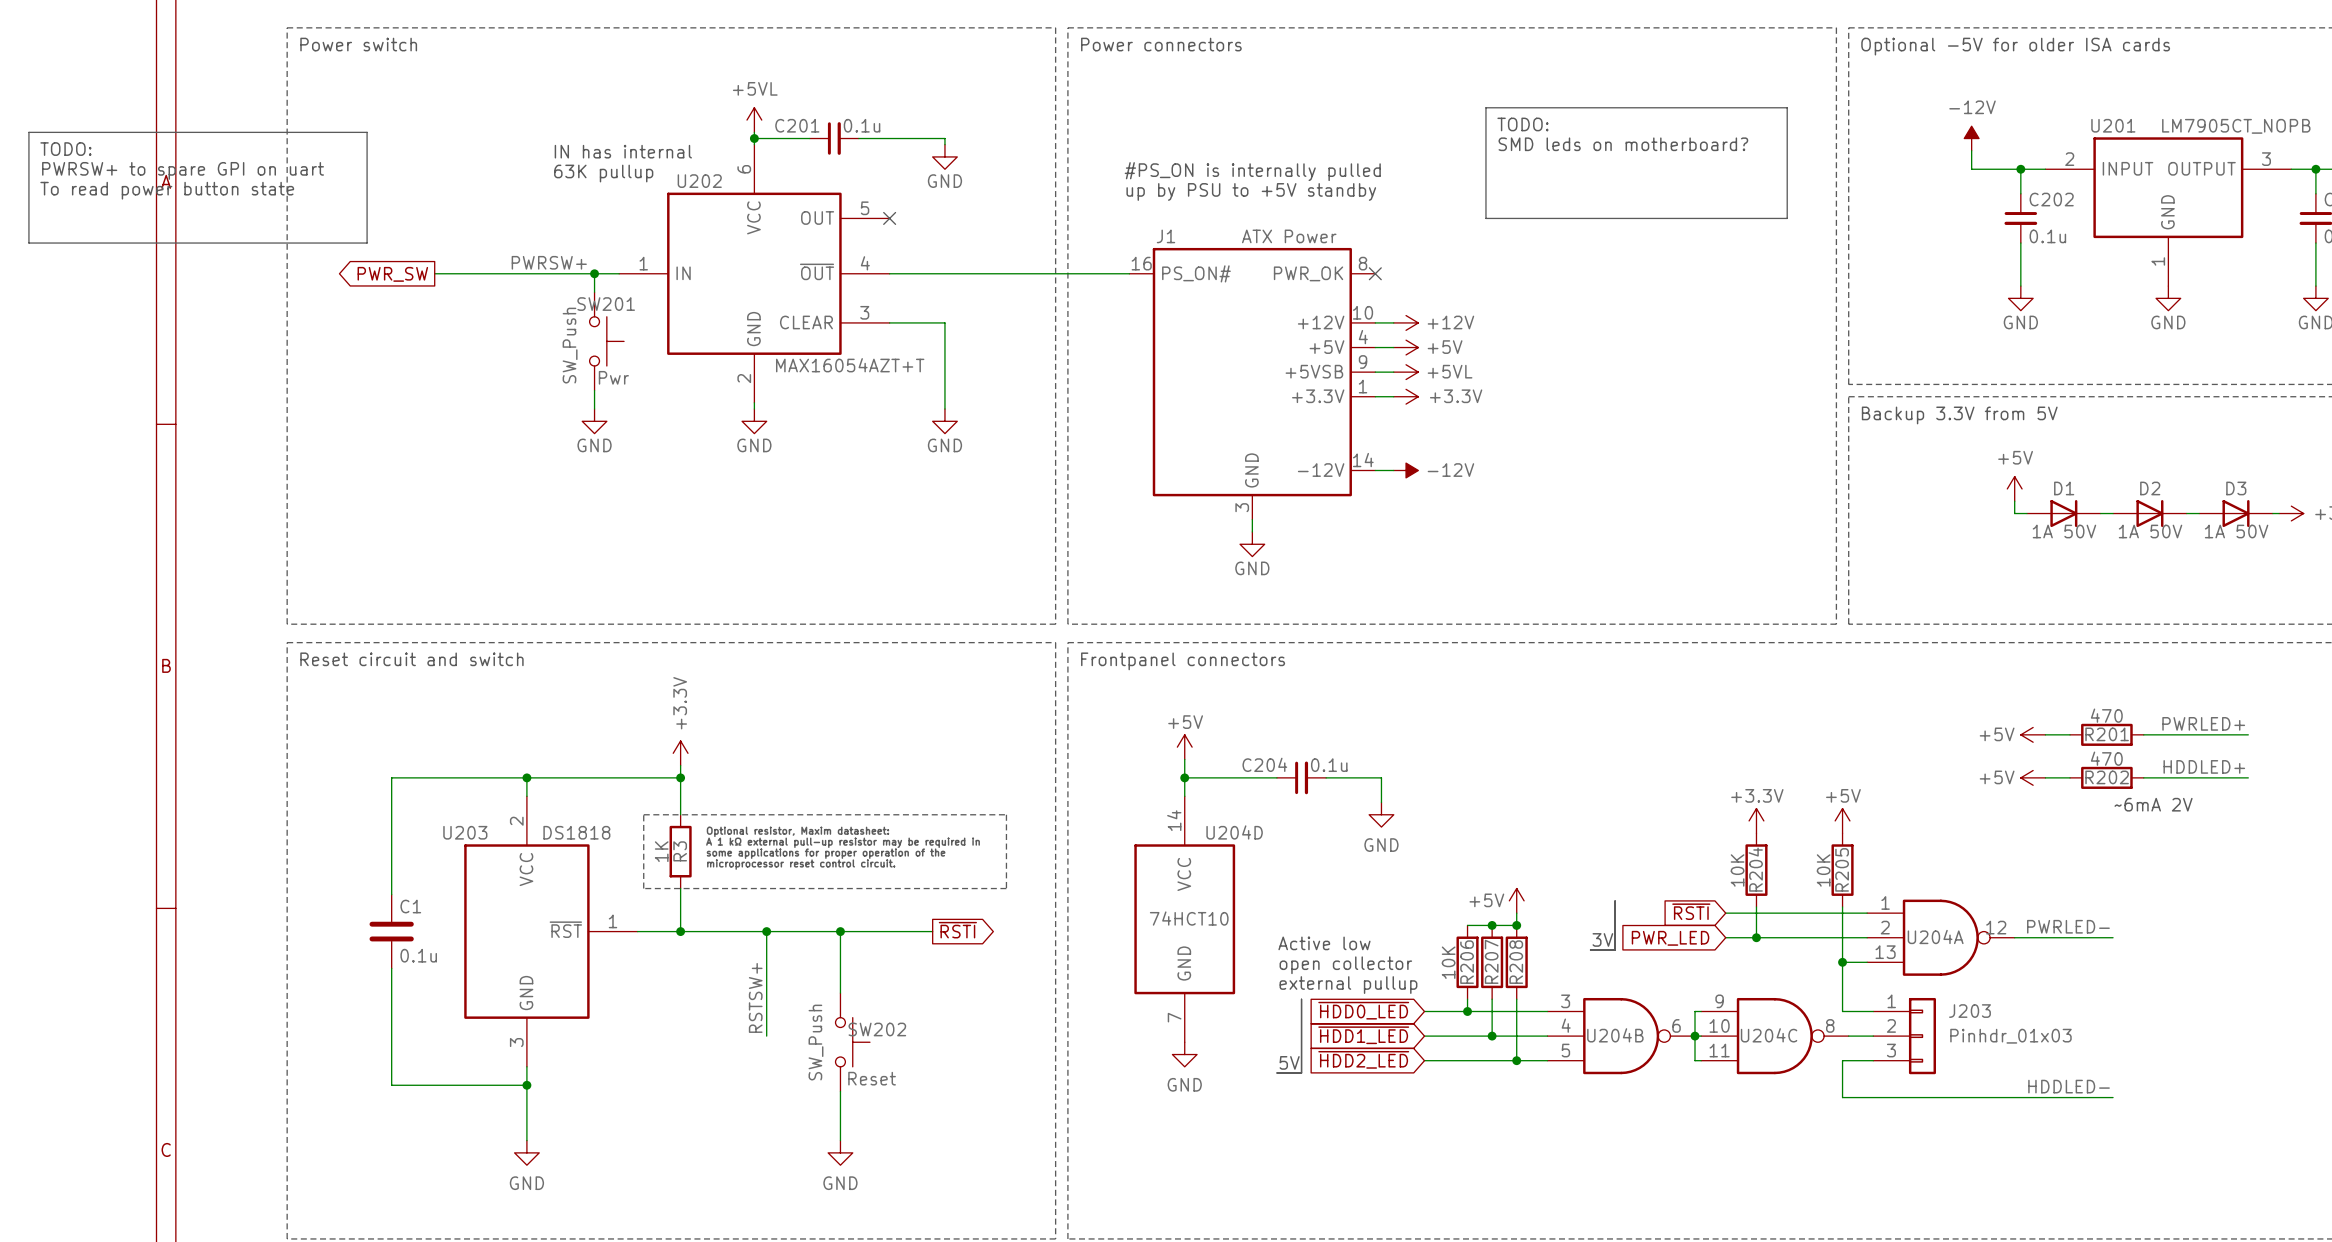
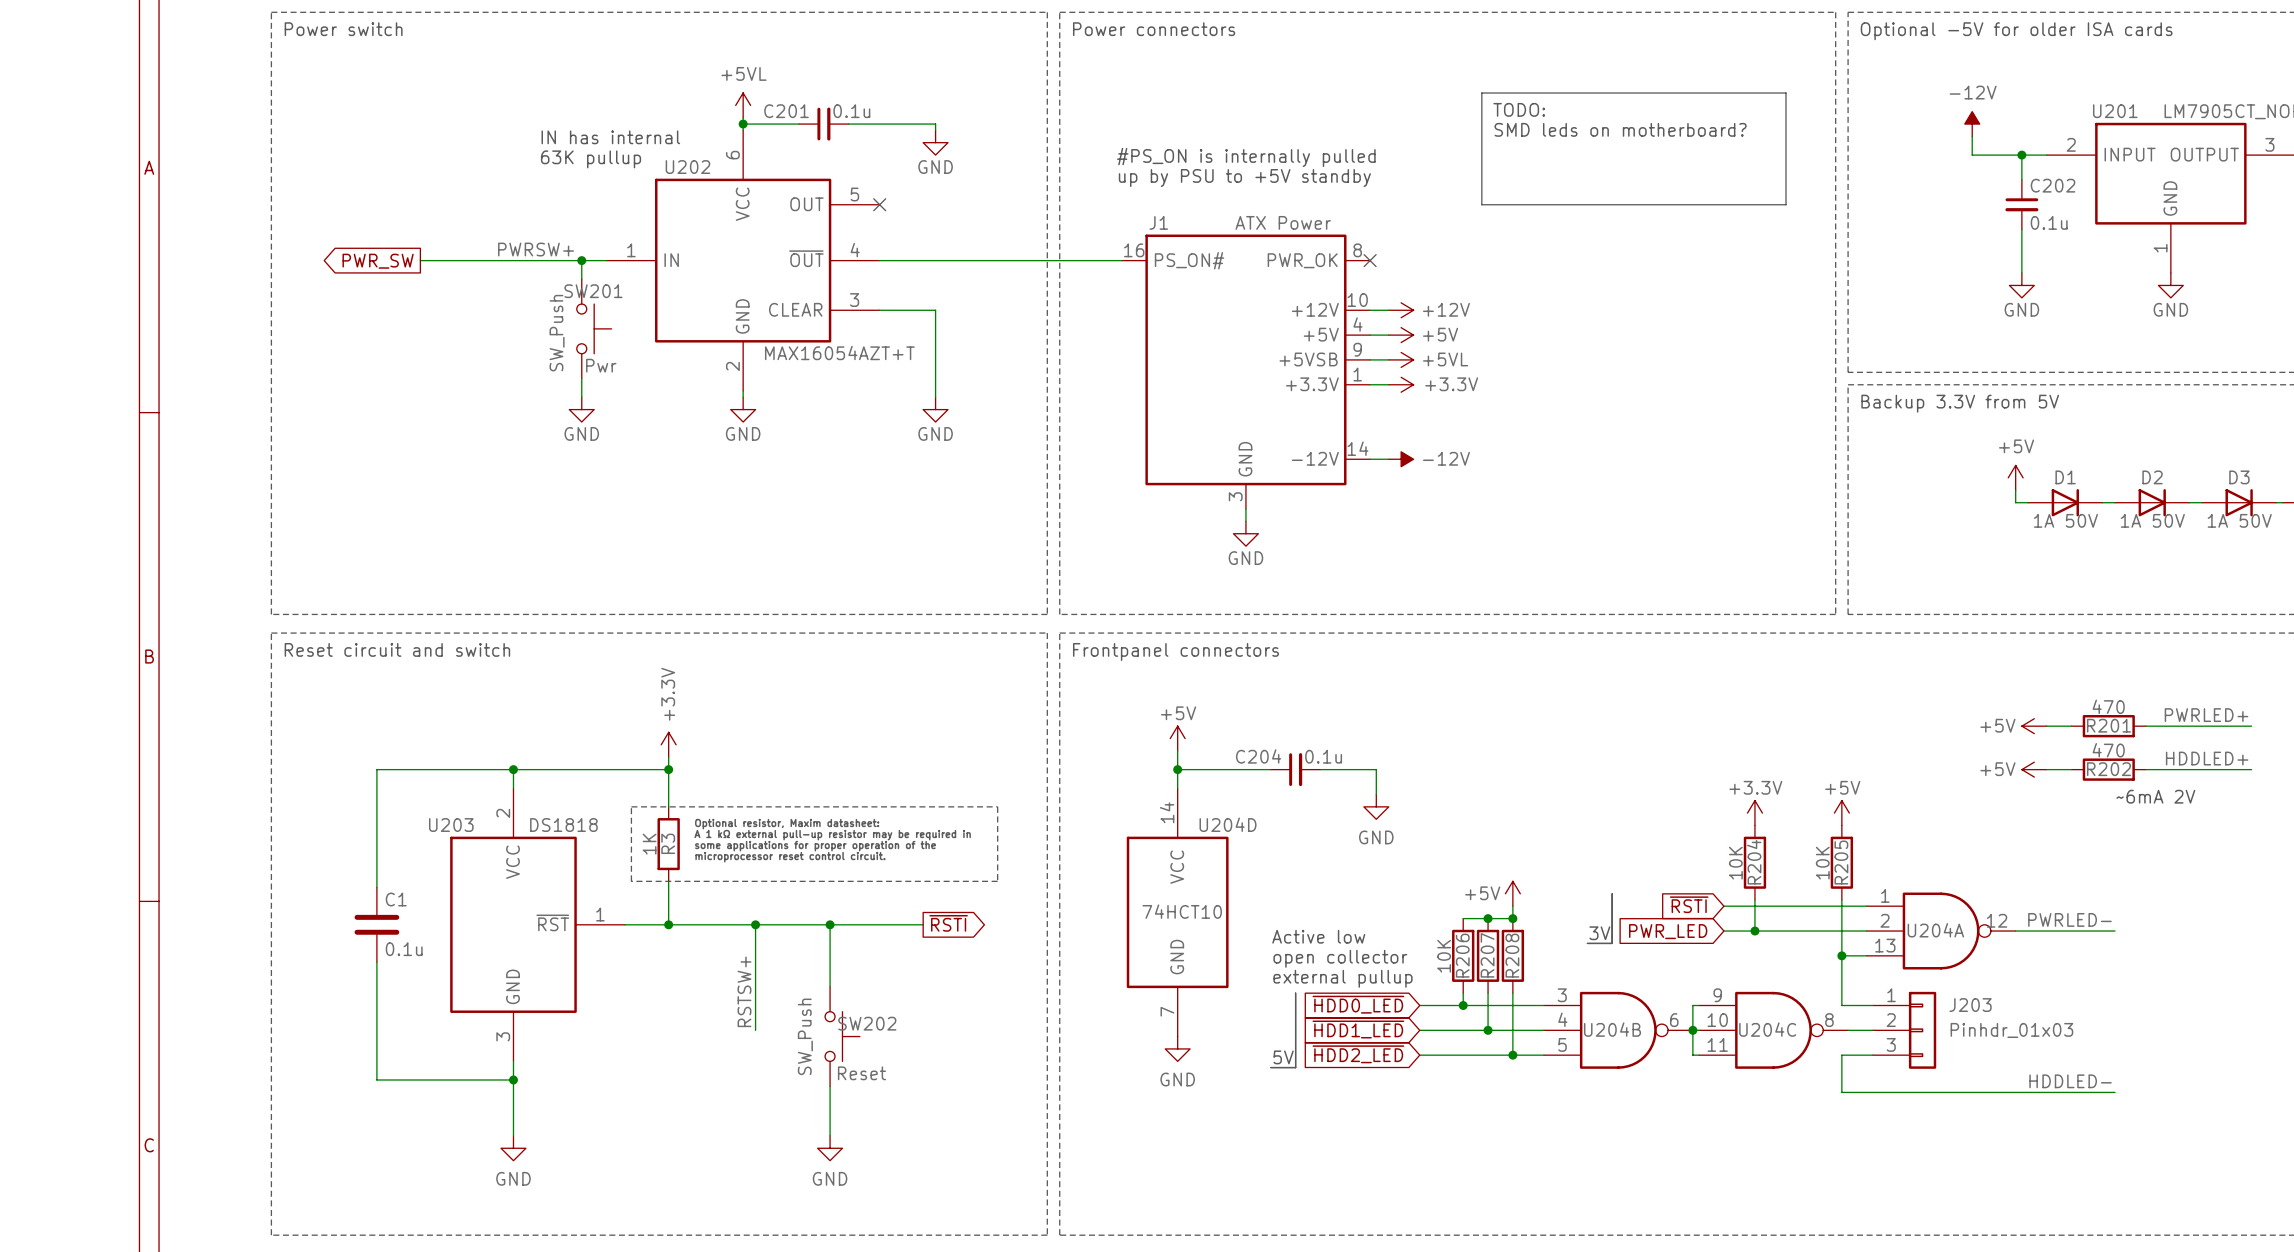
line: (28, 132) (367, 132) (367, 243) (28, 243) (28, 132) -> none
text: TODO: (65, 149) -> none
text: PWRSW+ to spare GPI on uart (183, 170) -> none
text: To read power button state (167, 190) -> none

